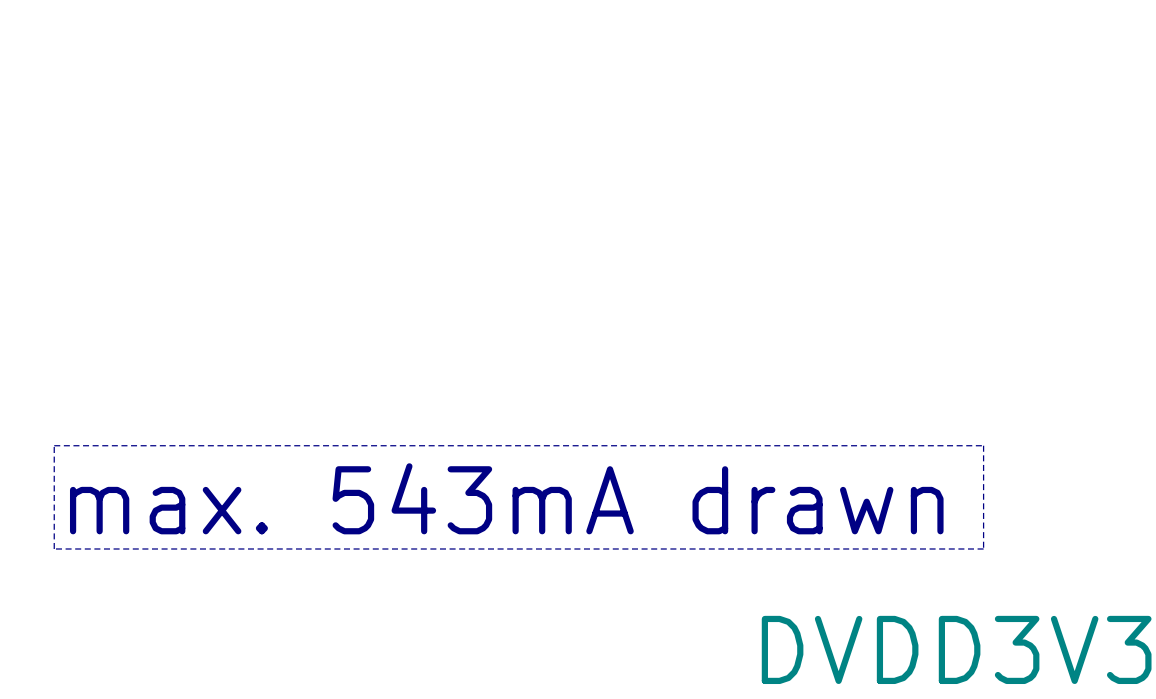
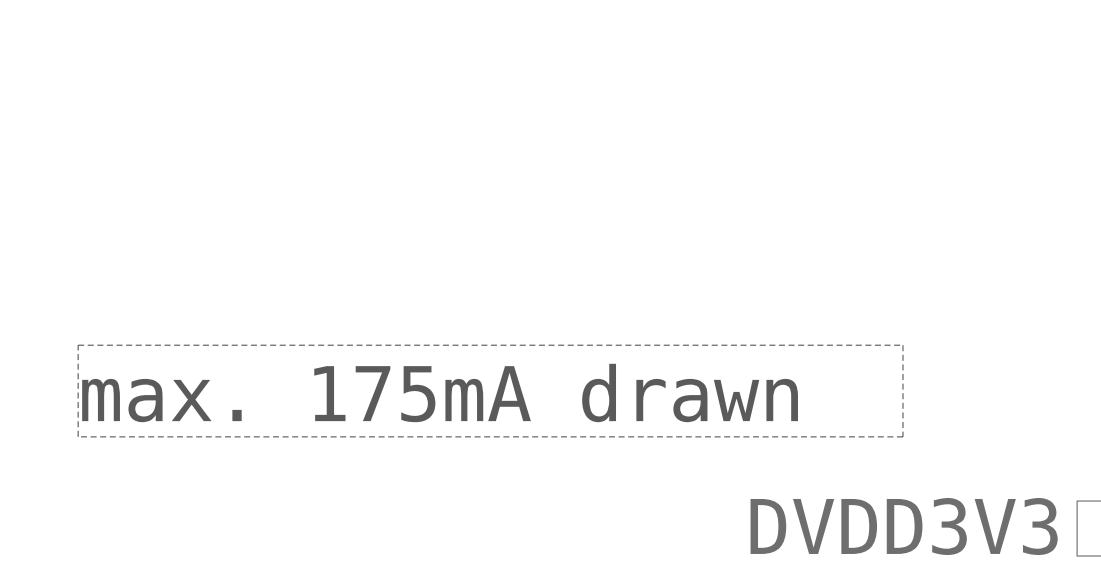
text: max. 543mA drawn (506, 498) -> max. 175mA drawn (440, 393)

